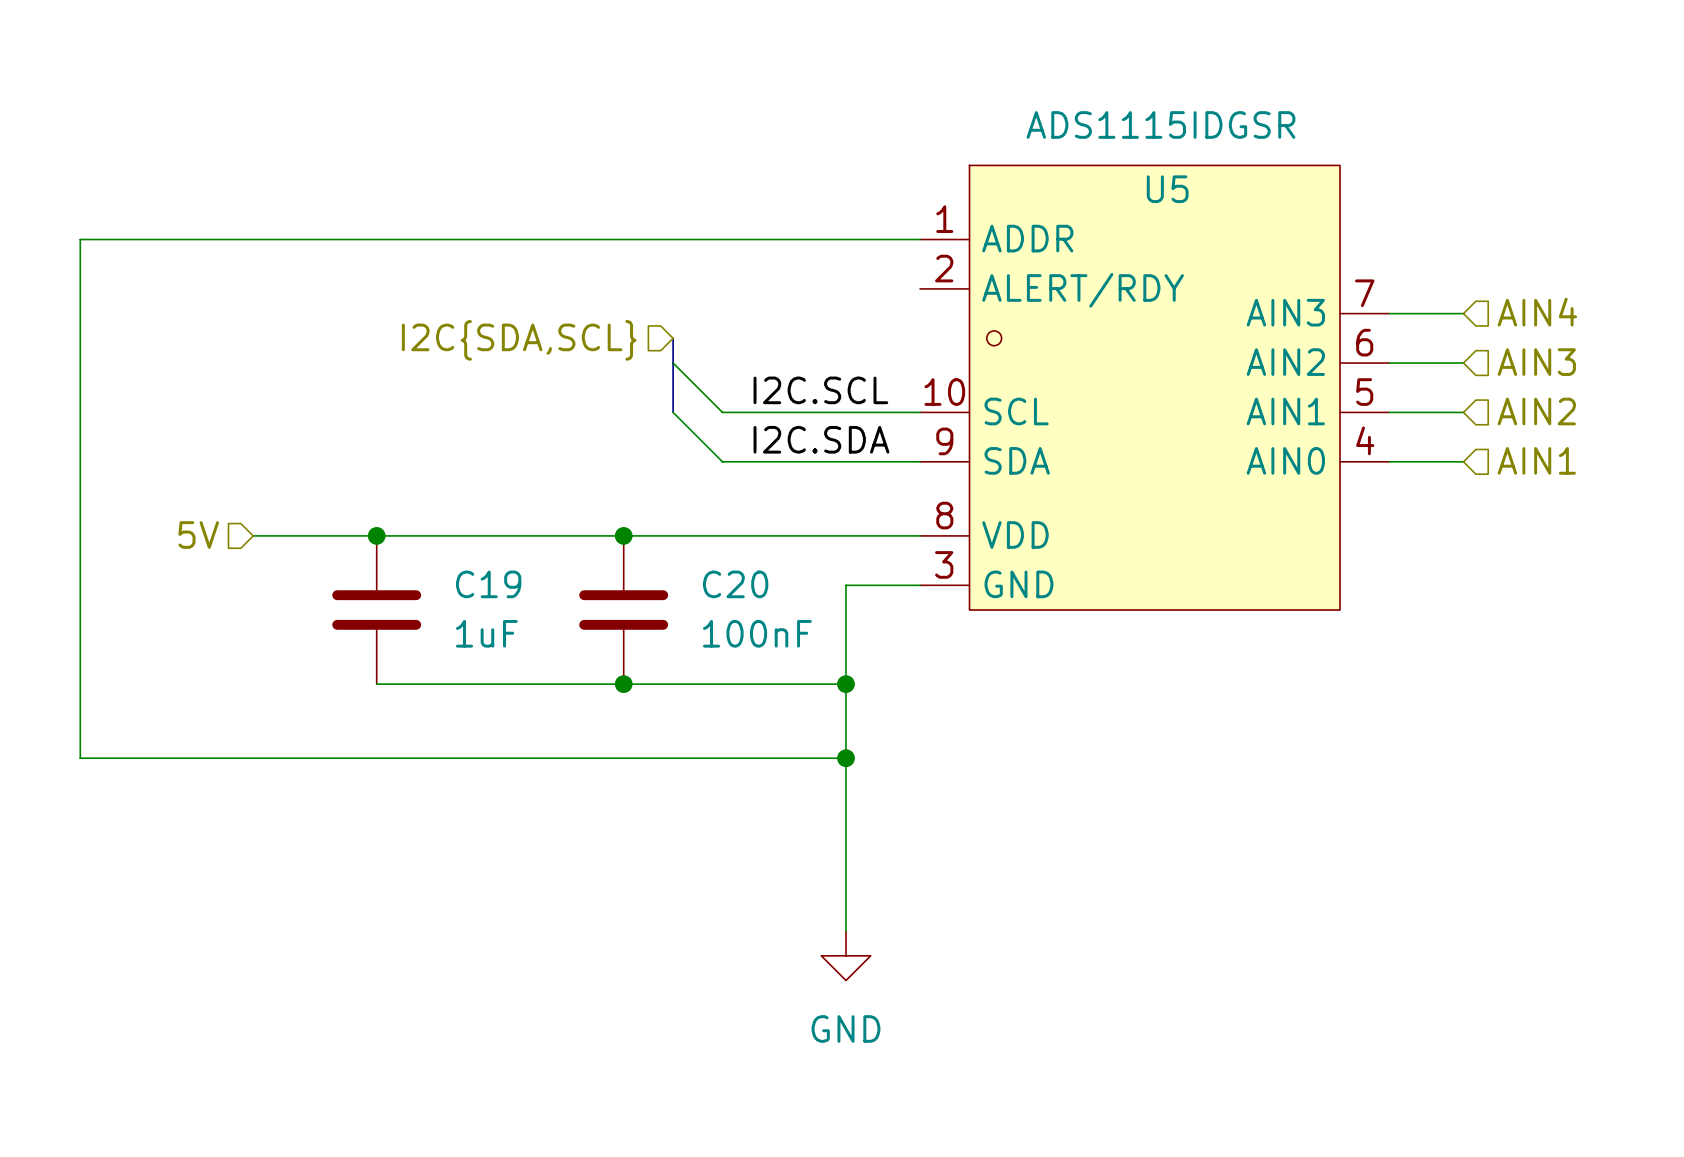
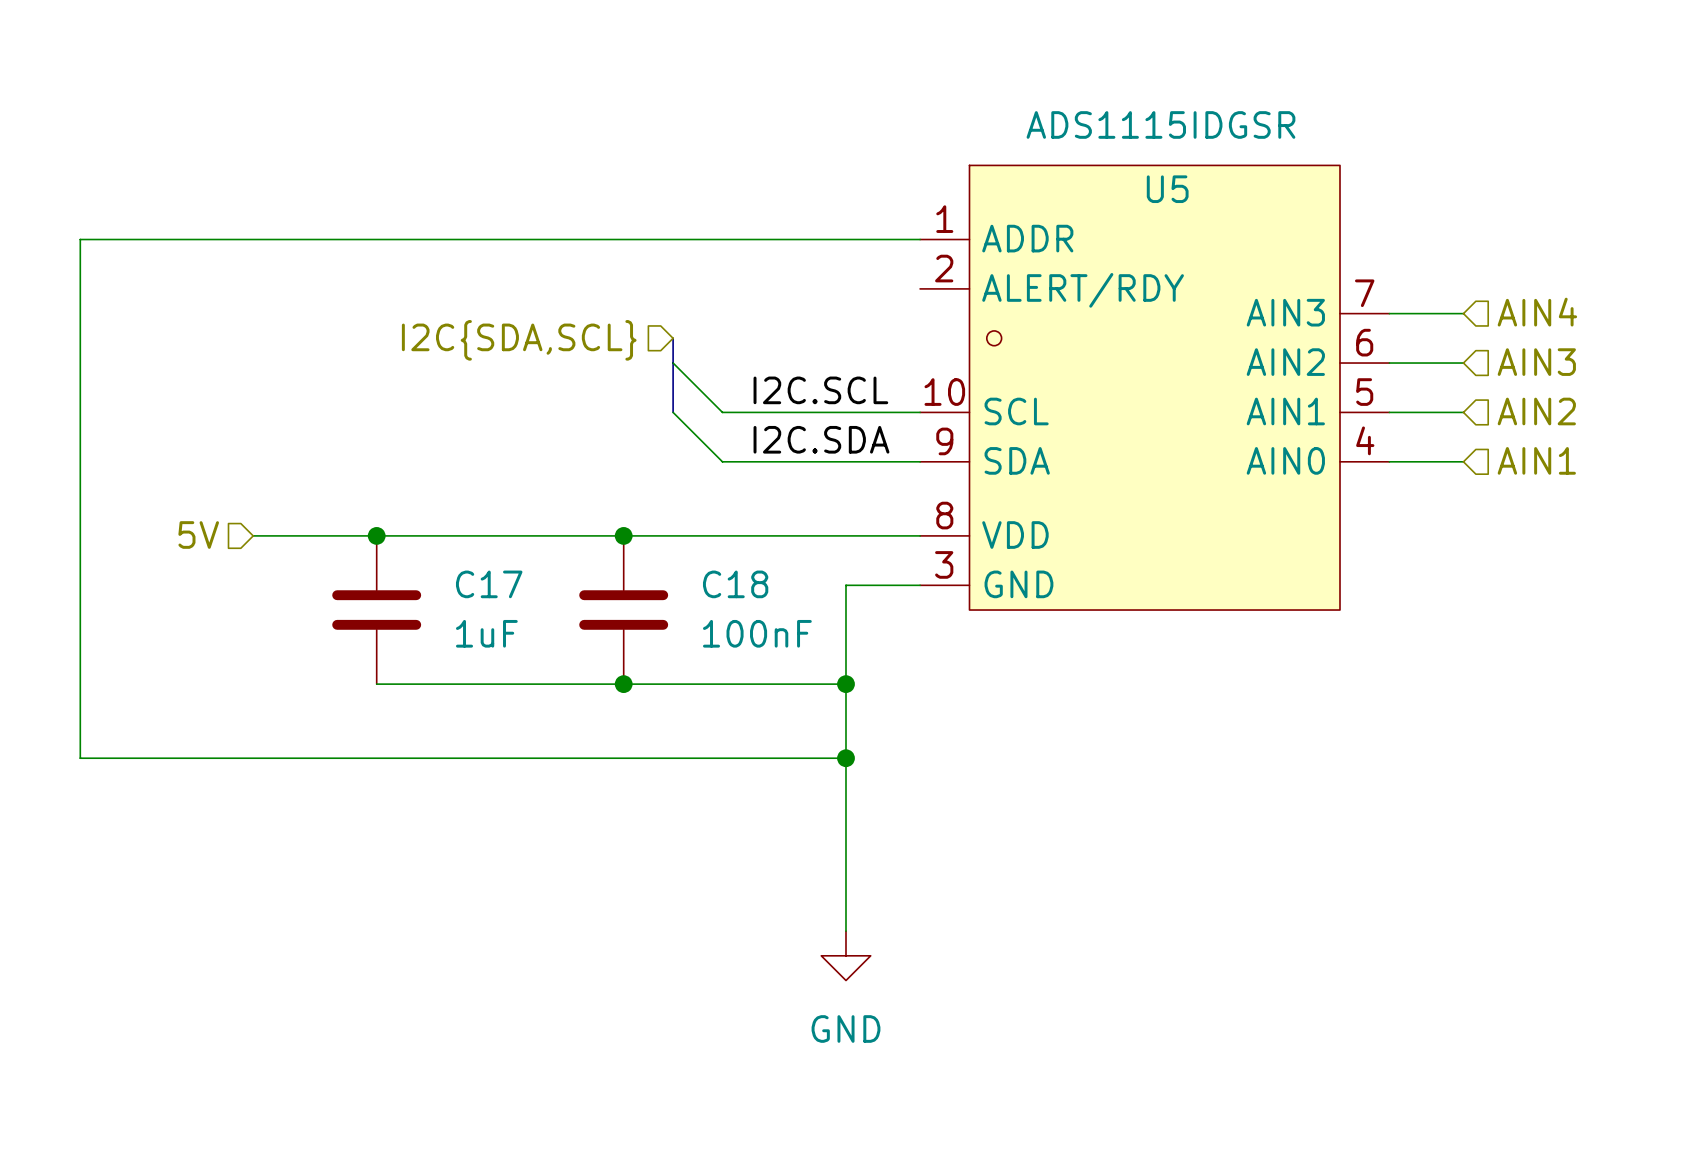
C19 name: C19 (488, 584) -> C17 (489, 584)
C20 name: C20 (735, 584) -> C18 (735, 584)

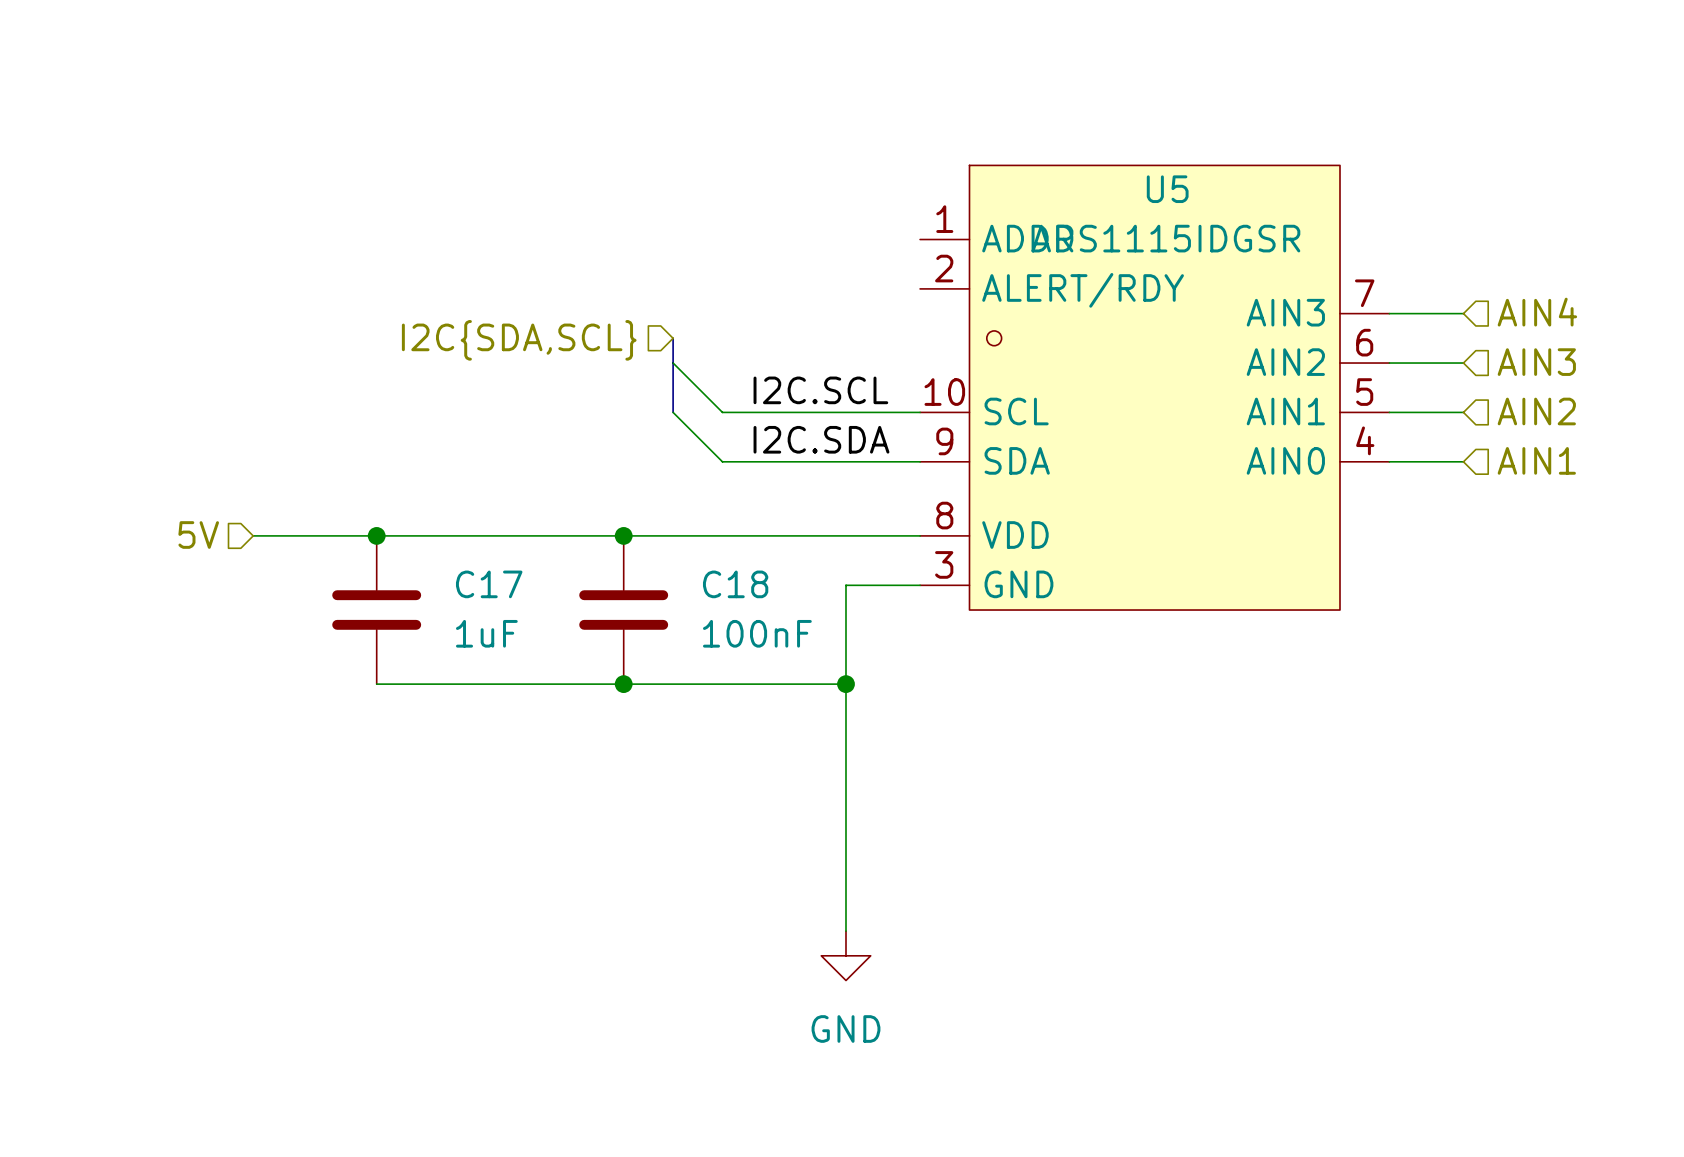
U5 value position: ADS1115IDGSR (1160, 124) -> ADS1115IDGSR (1165, 238)
wire: (920, 239) (80, 239) (80, 758) (845, 758) -> none
junction: (845, 758) -> none

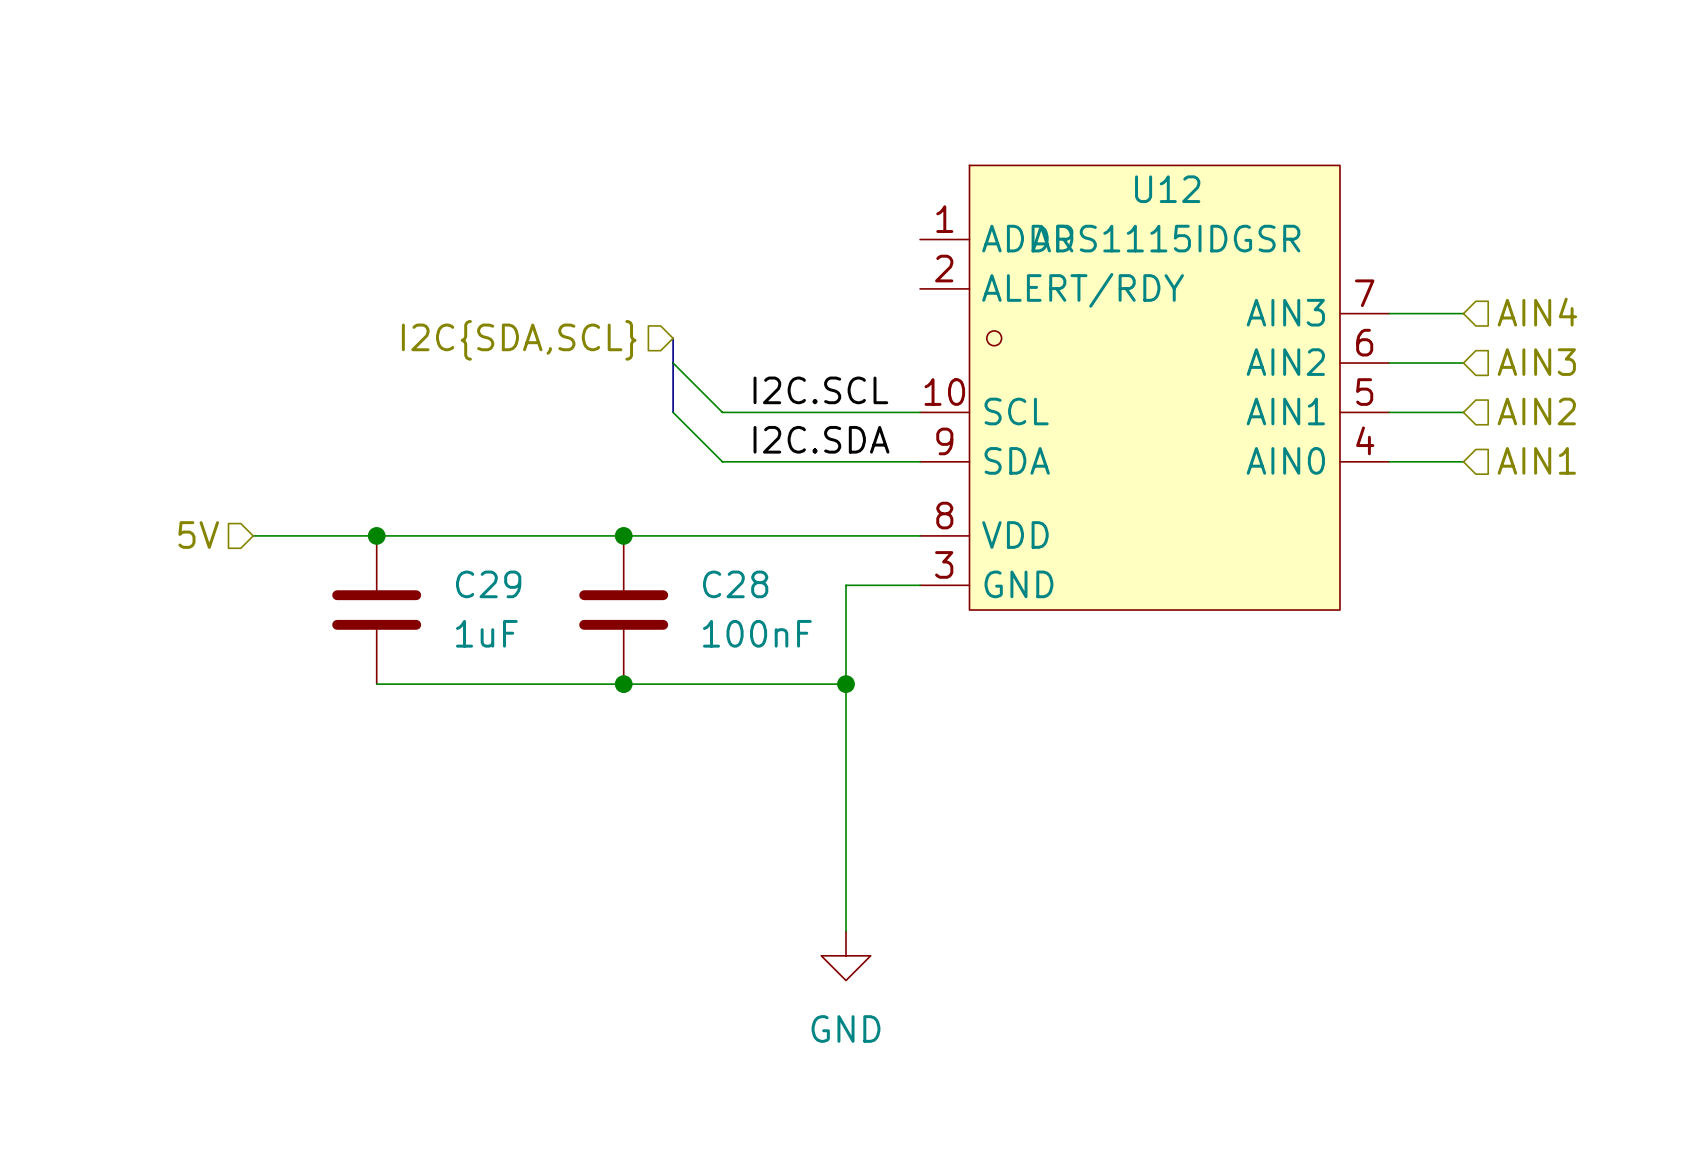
U5 name: U5 (1167, 189) -> U12 (1167, 189)
C17 name: C17 (489, 584) -> C29 (488, 584)
C18 name: C18 (735, 584) -> C28 (735, 584)

